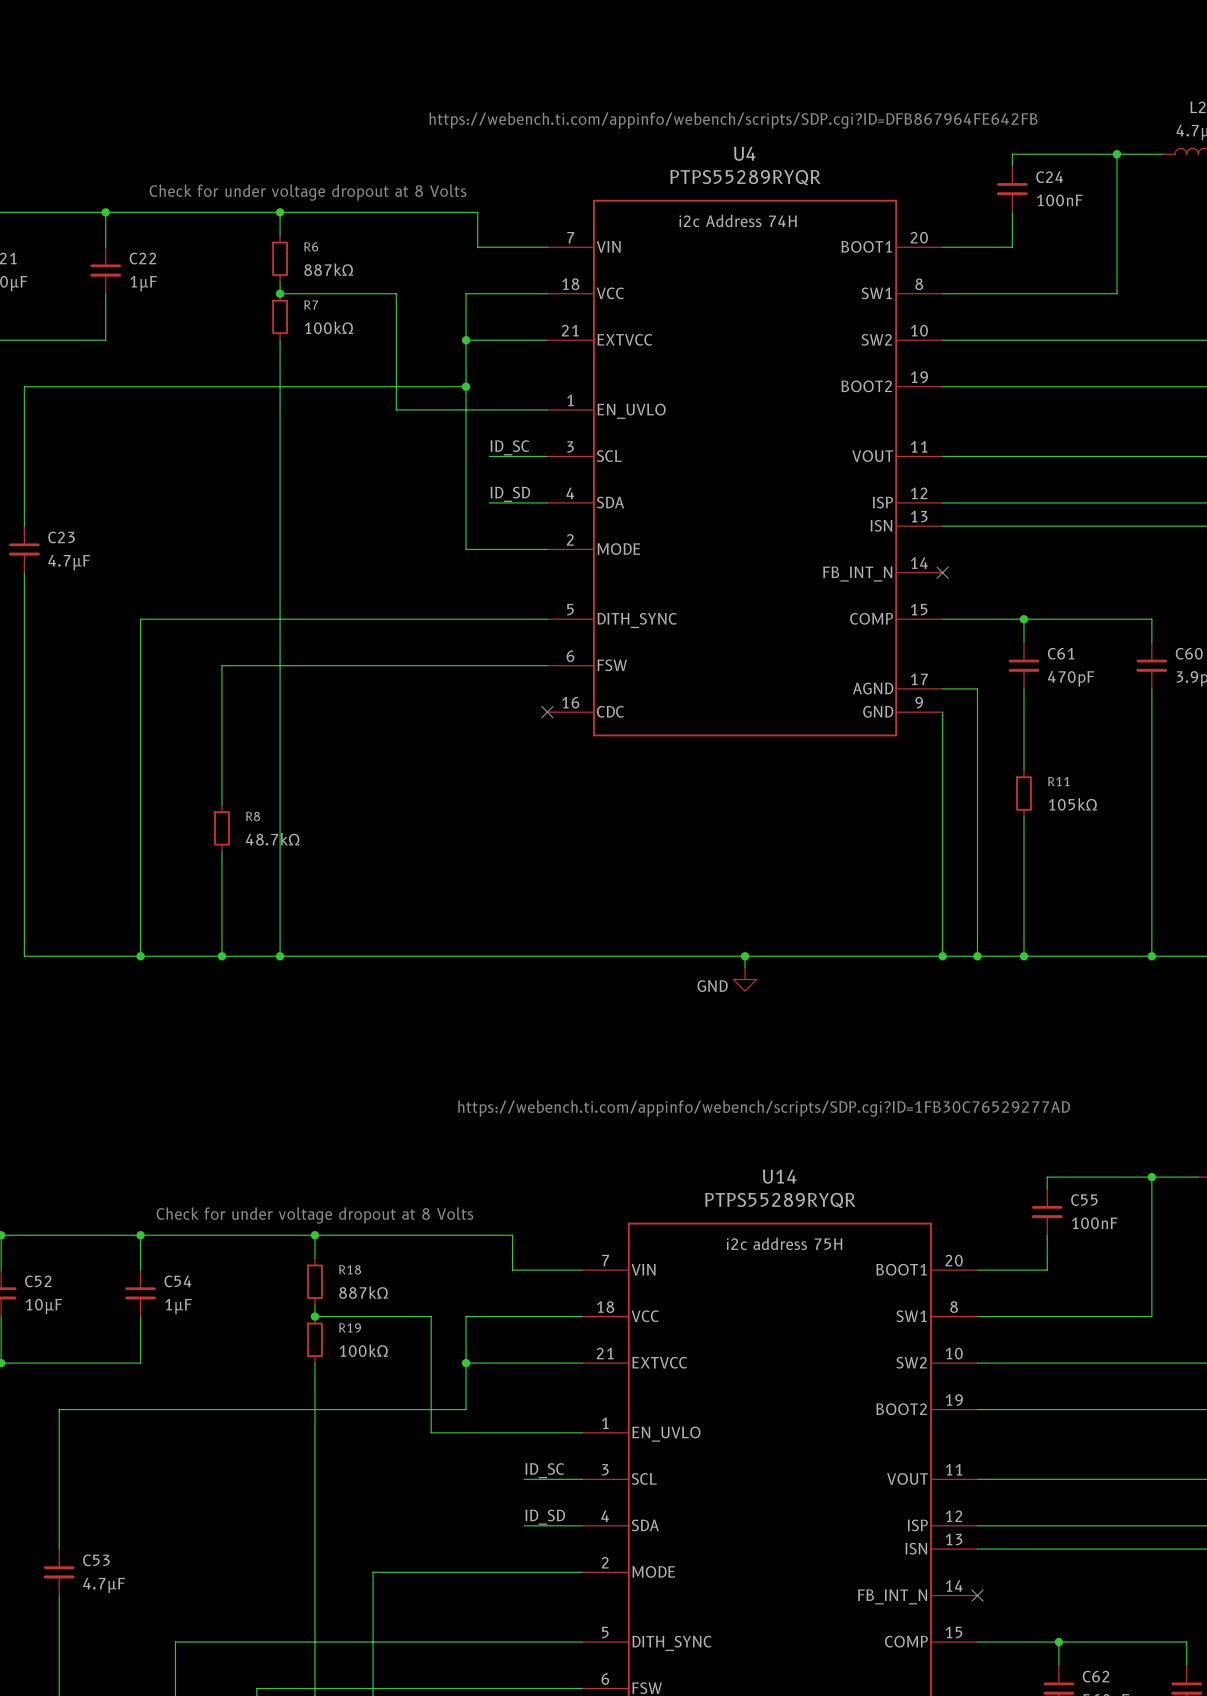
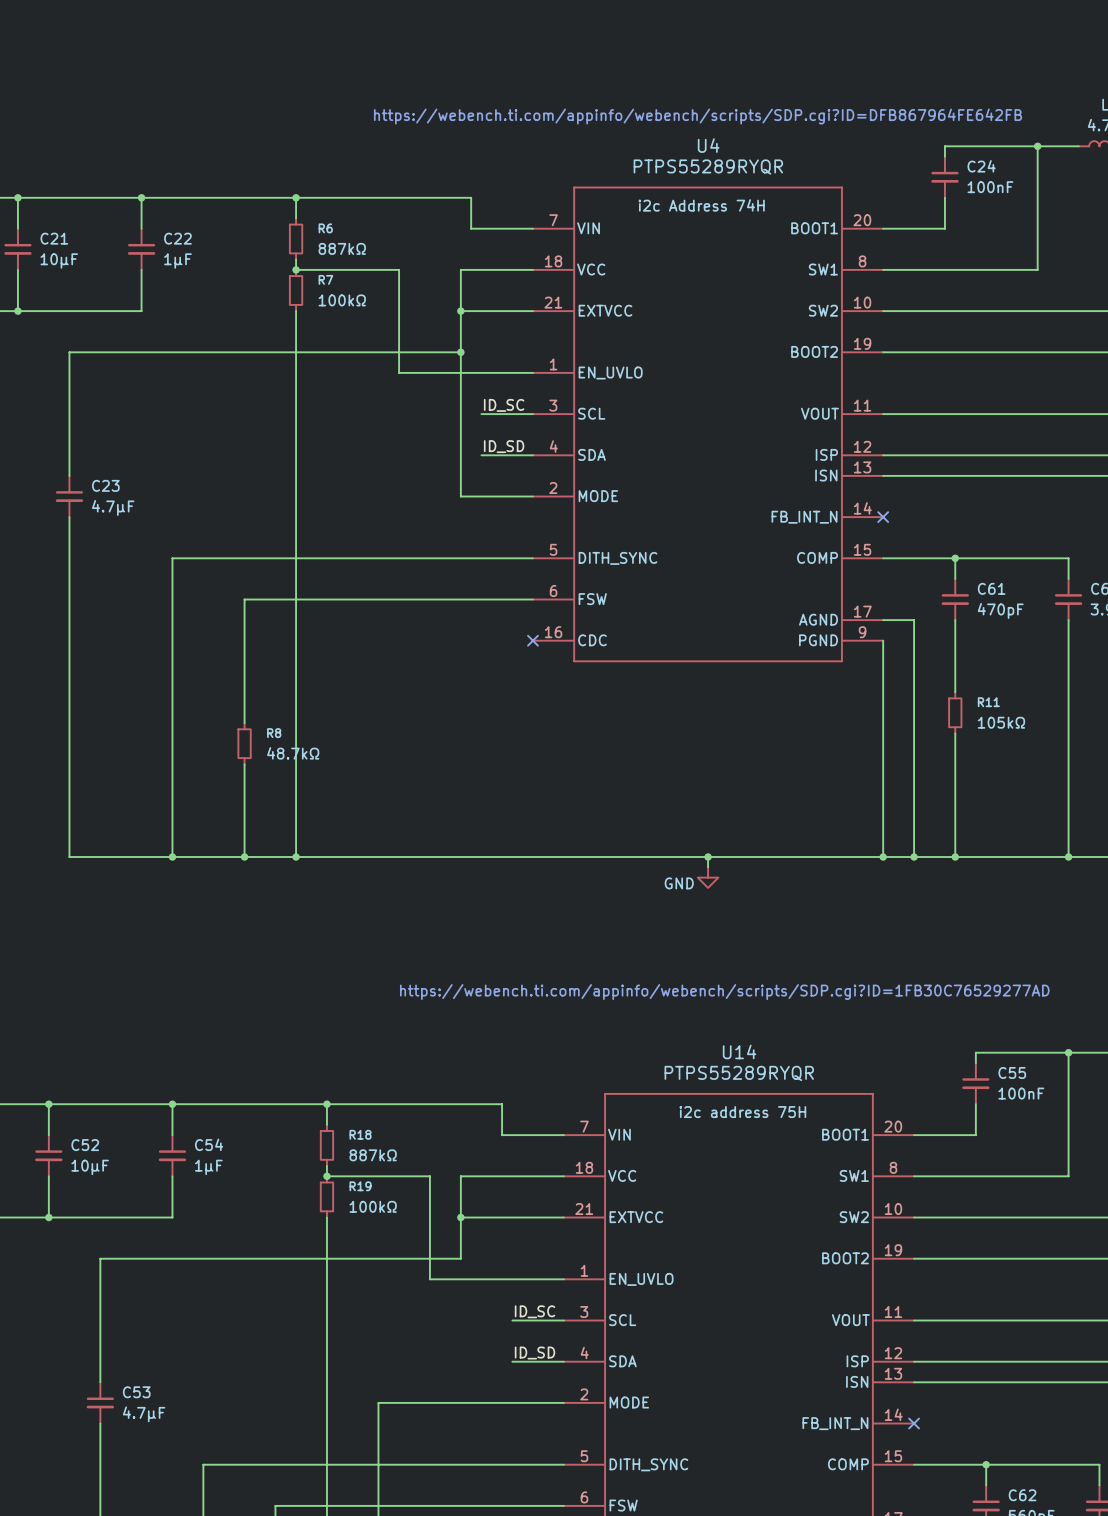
text: Check for under voltage dropout at 8 Volts (307, 192) -> none
U4 pin name: GND (878, 711) -> PGND (818, 640)
text: Check for under voltage dropout at 8 Volts (314, 1215) -> none

